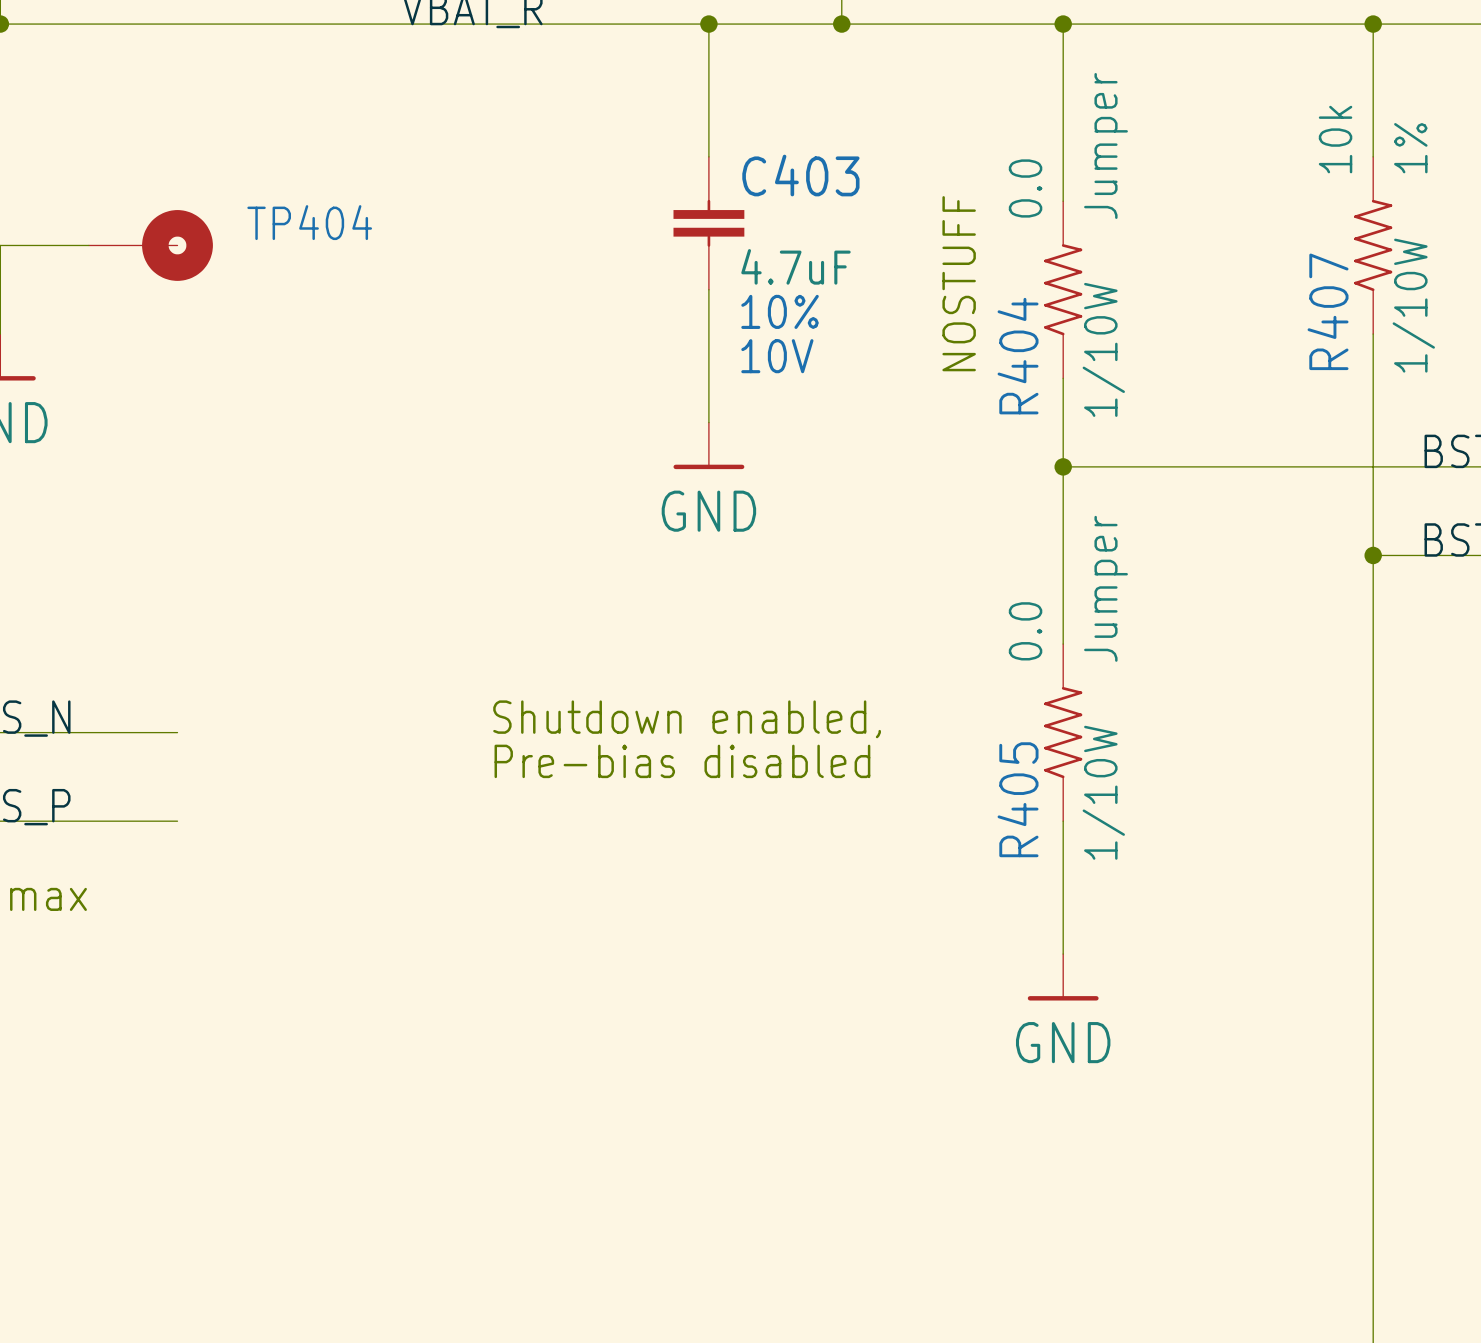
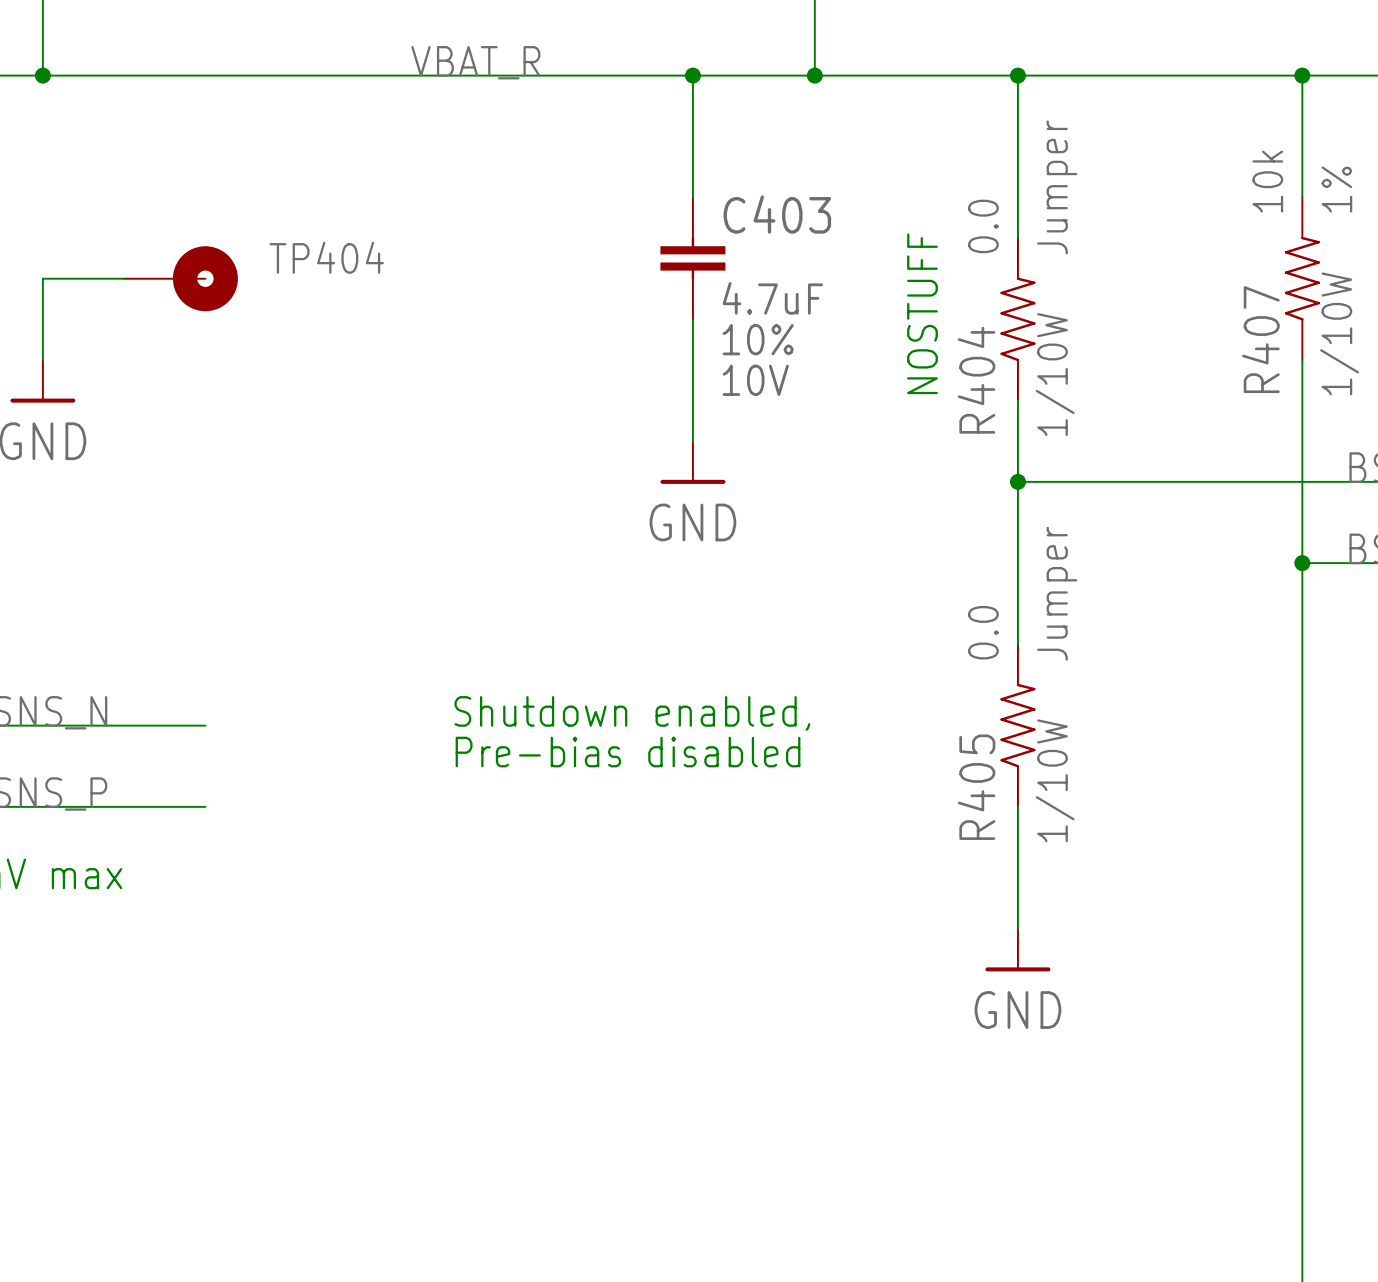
text position: Shutdown enabled, (687, 719) -> Shutdown enabled, (632, 713)
text position: Pre-bias disabled (682, 761) -> Pre-bias disabled (628, 752)

